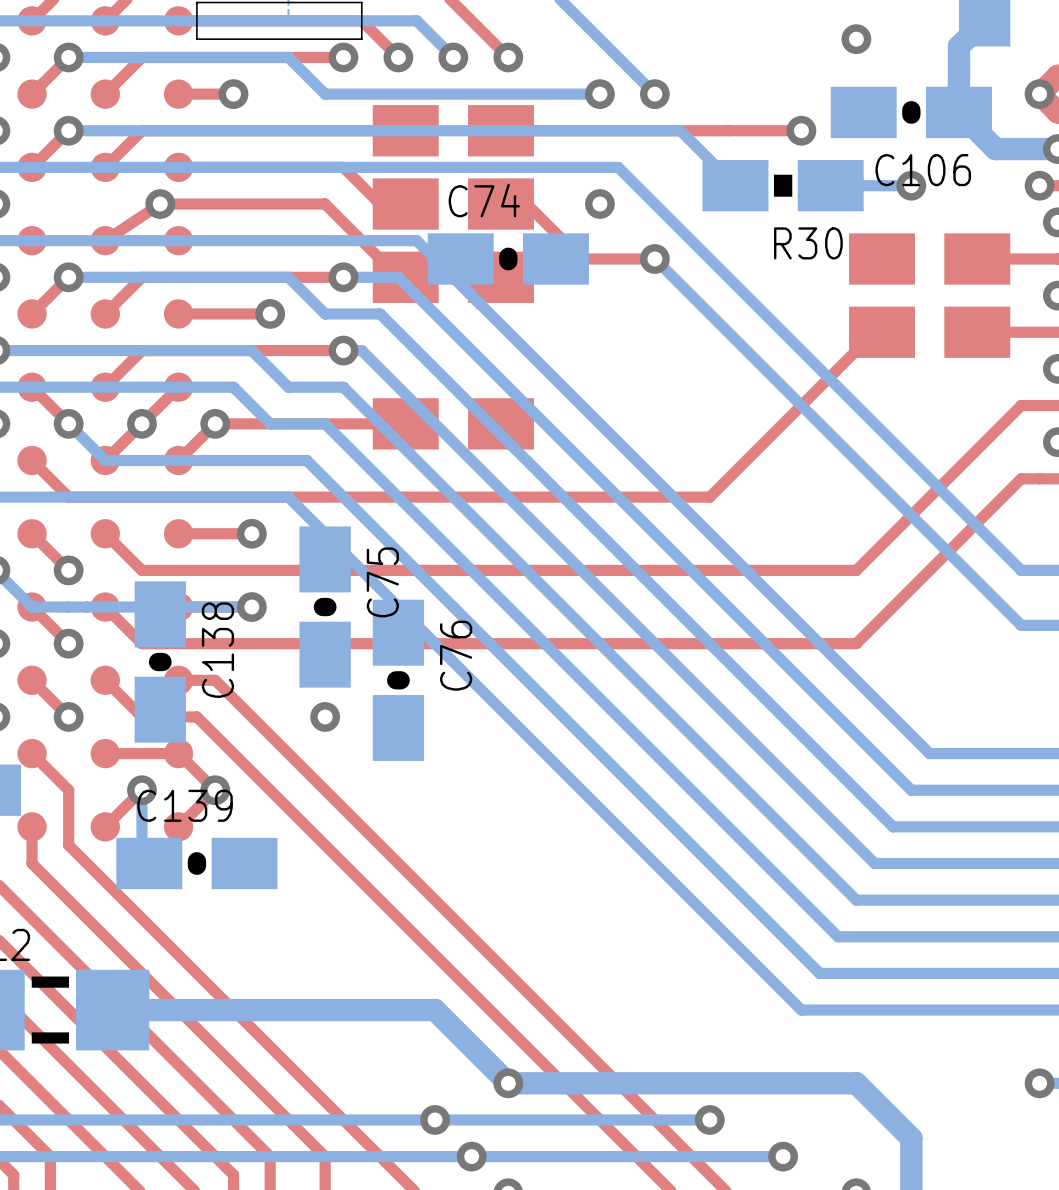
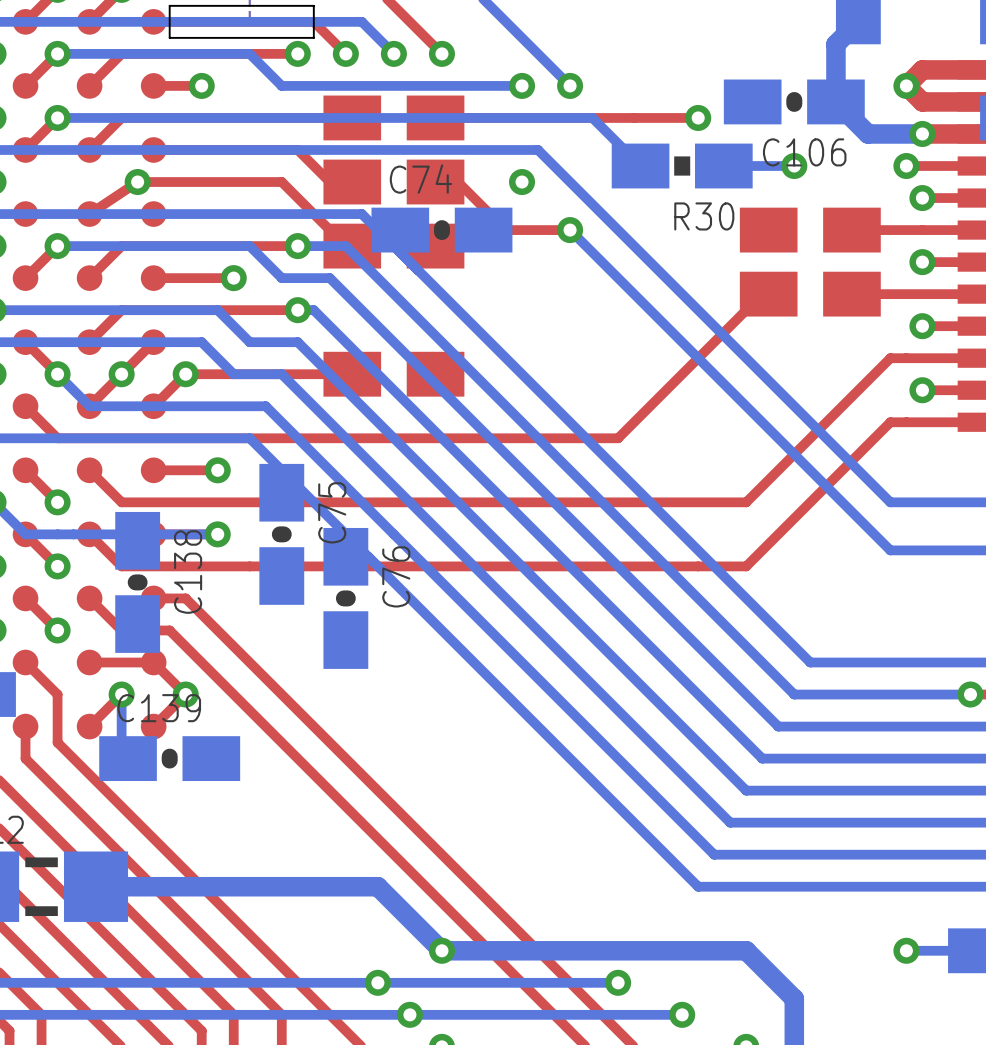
via: (856, 39) -> none
via: (325, 716) -> none

